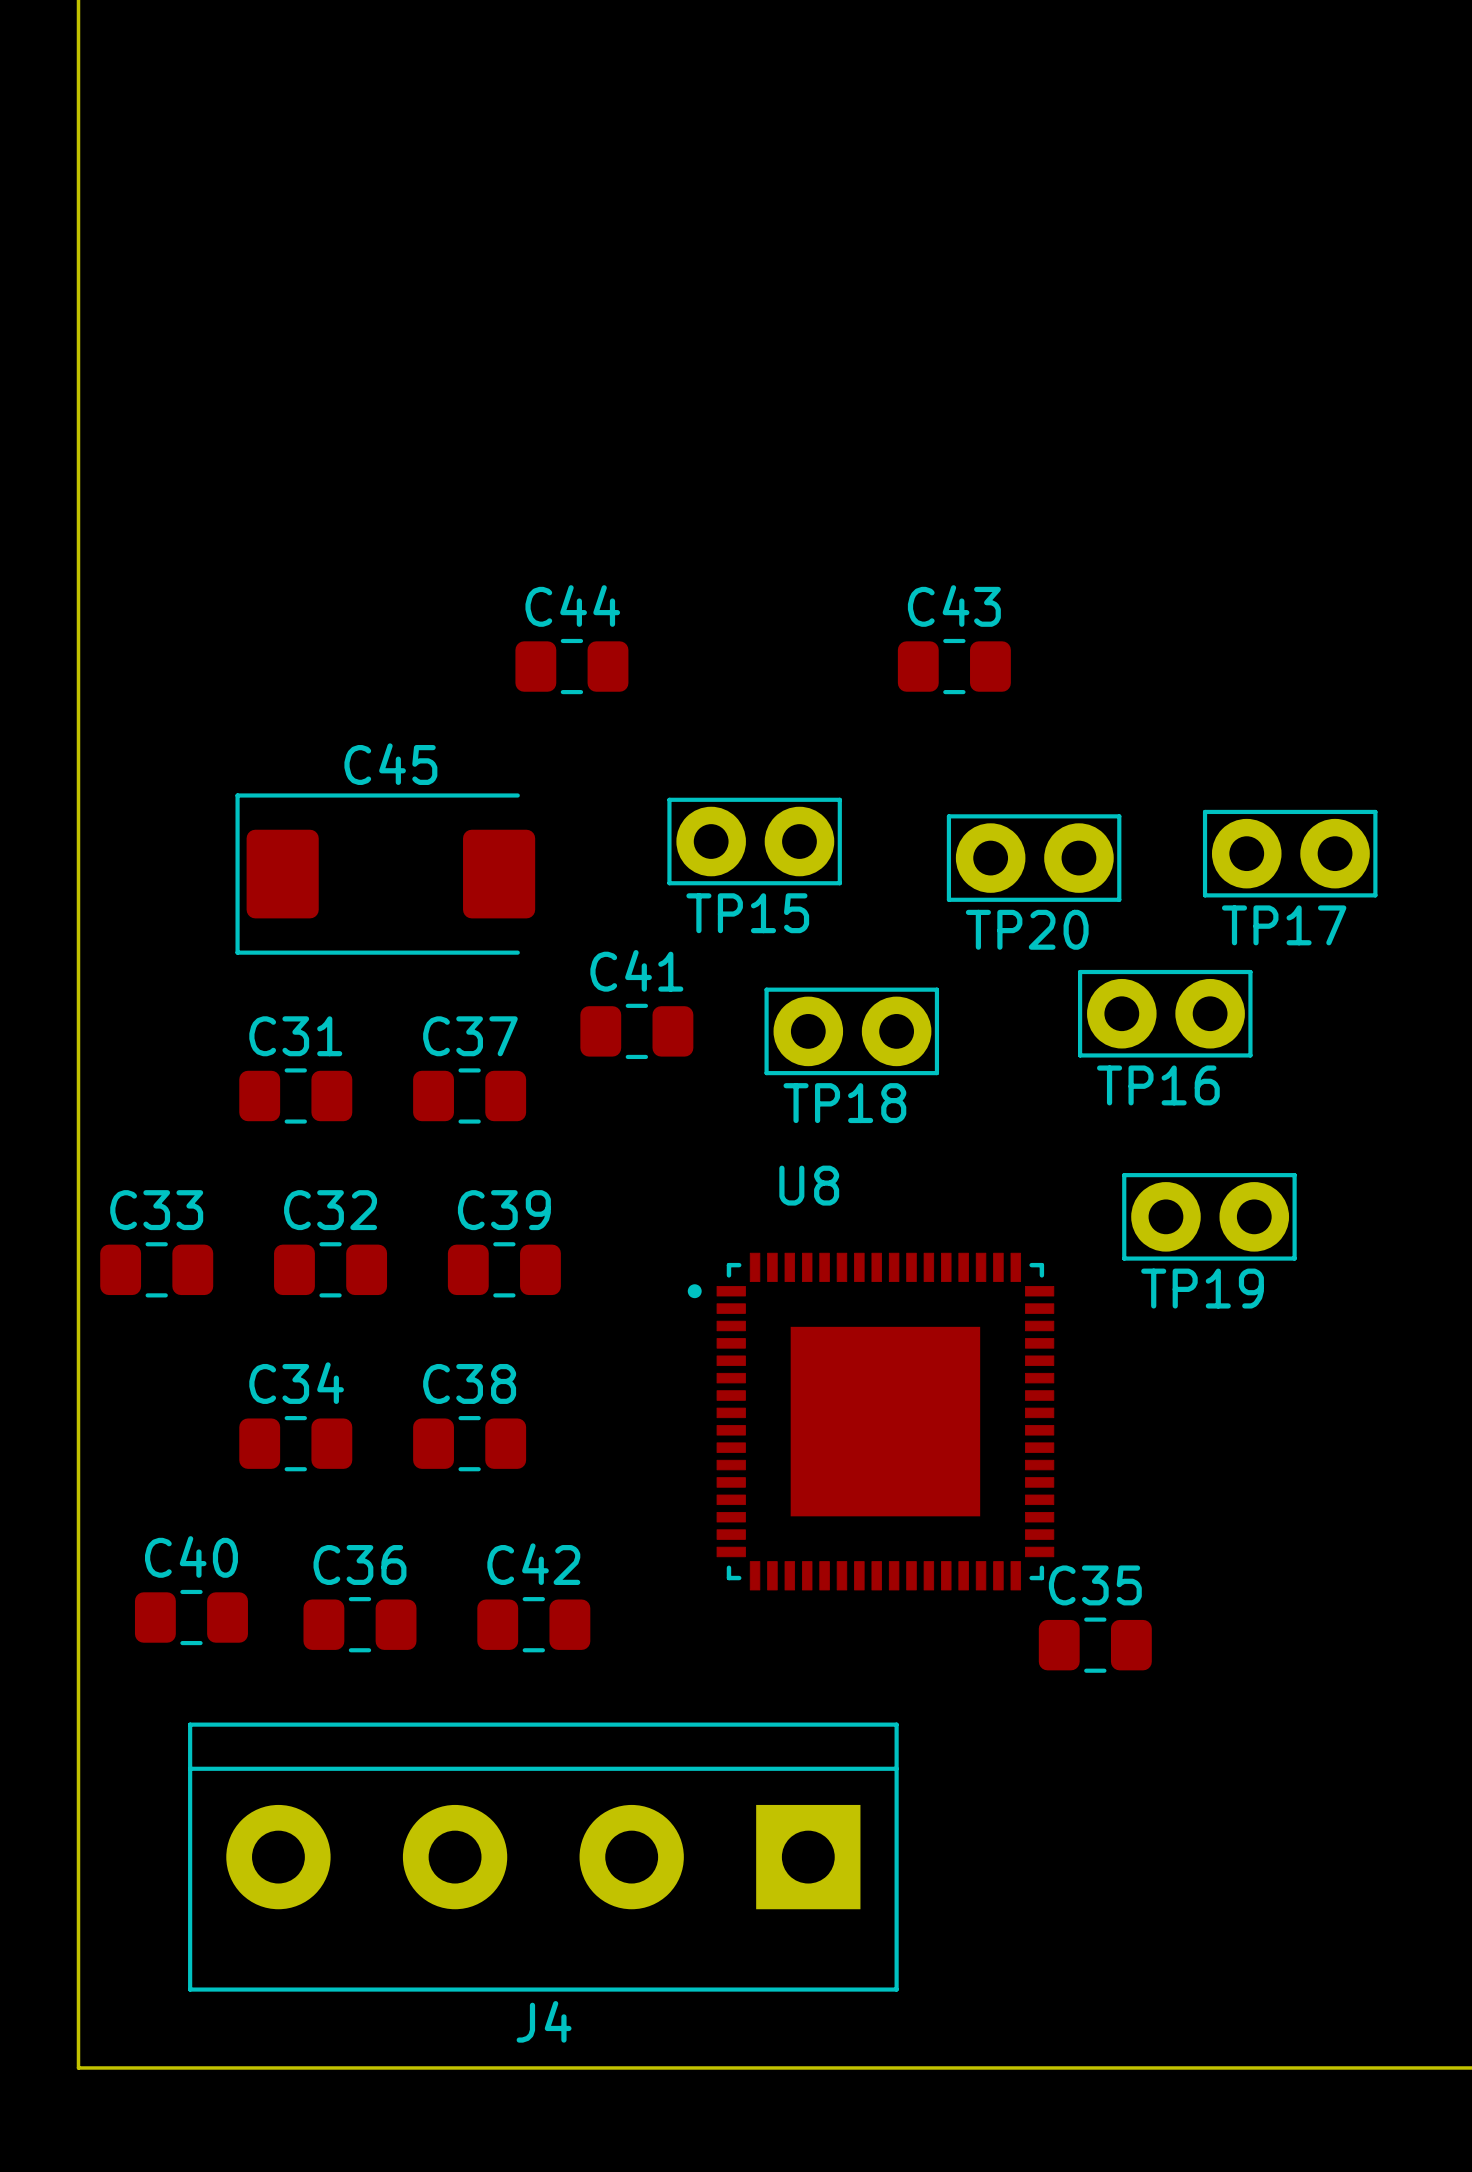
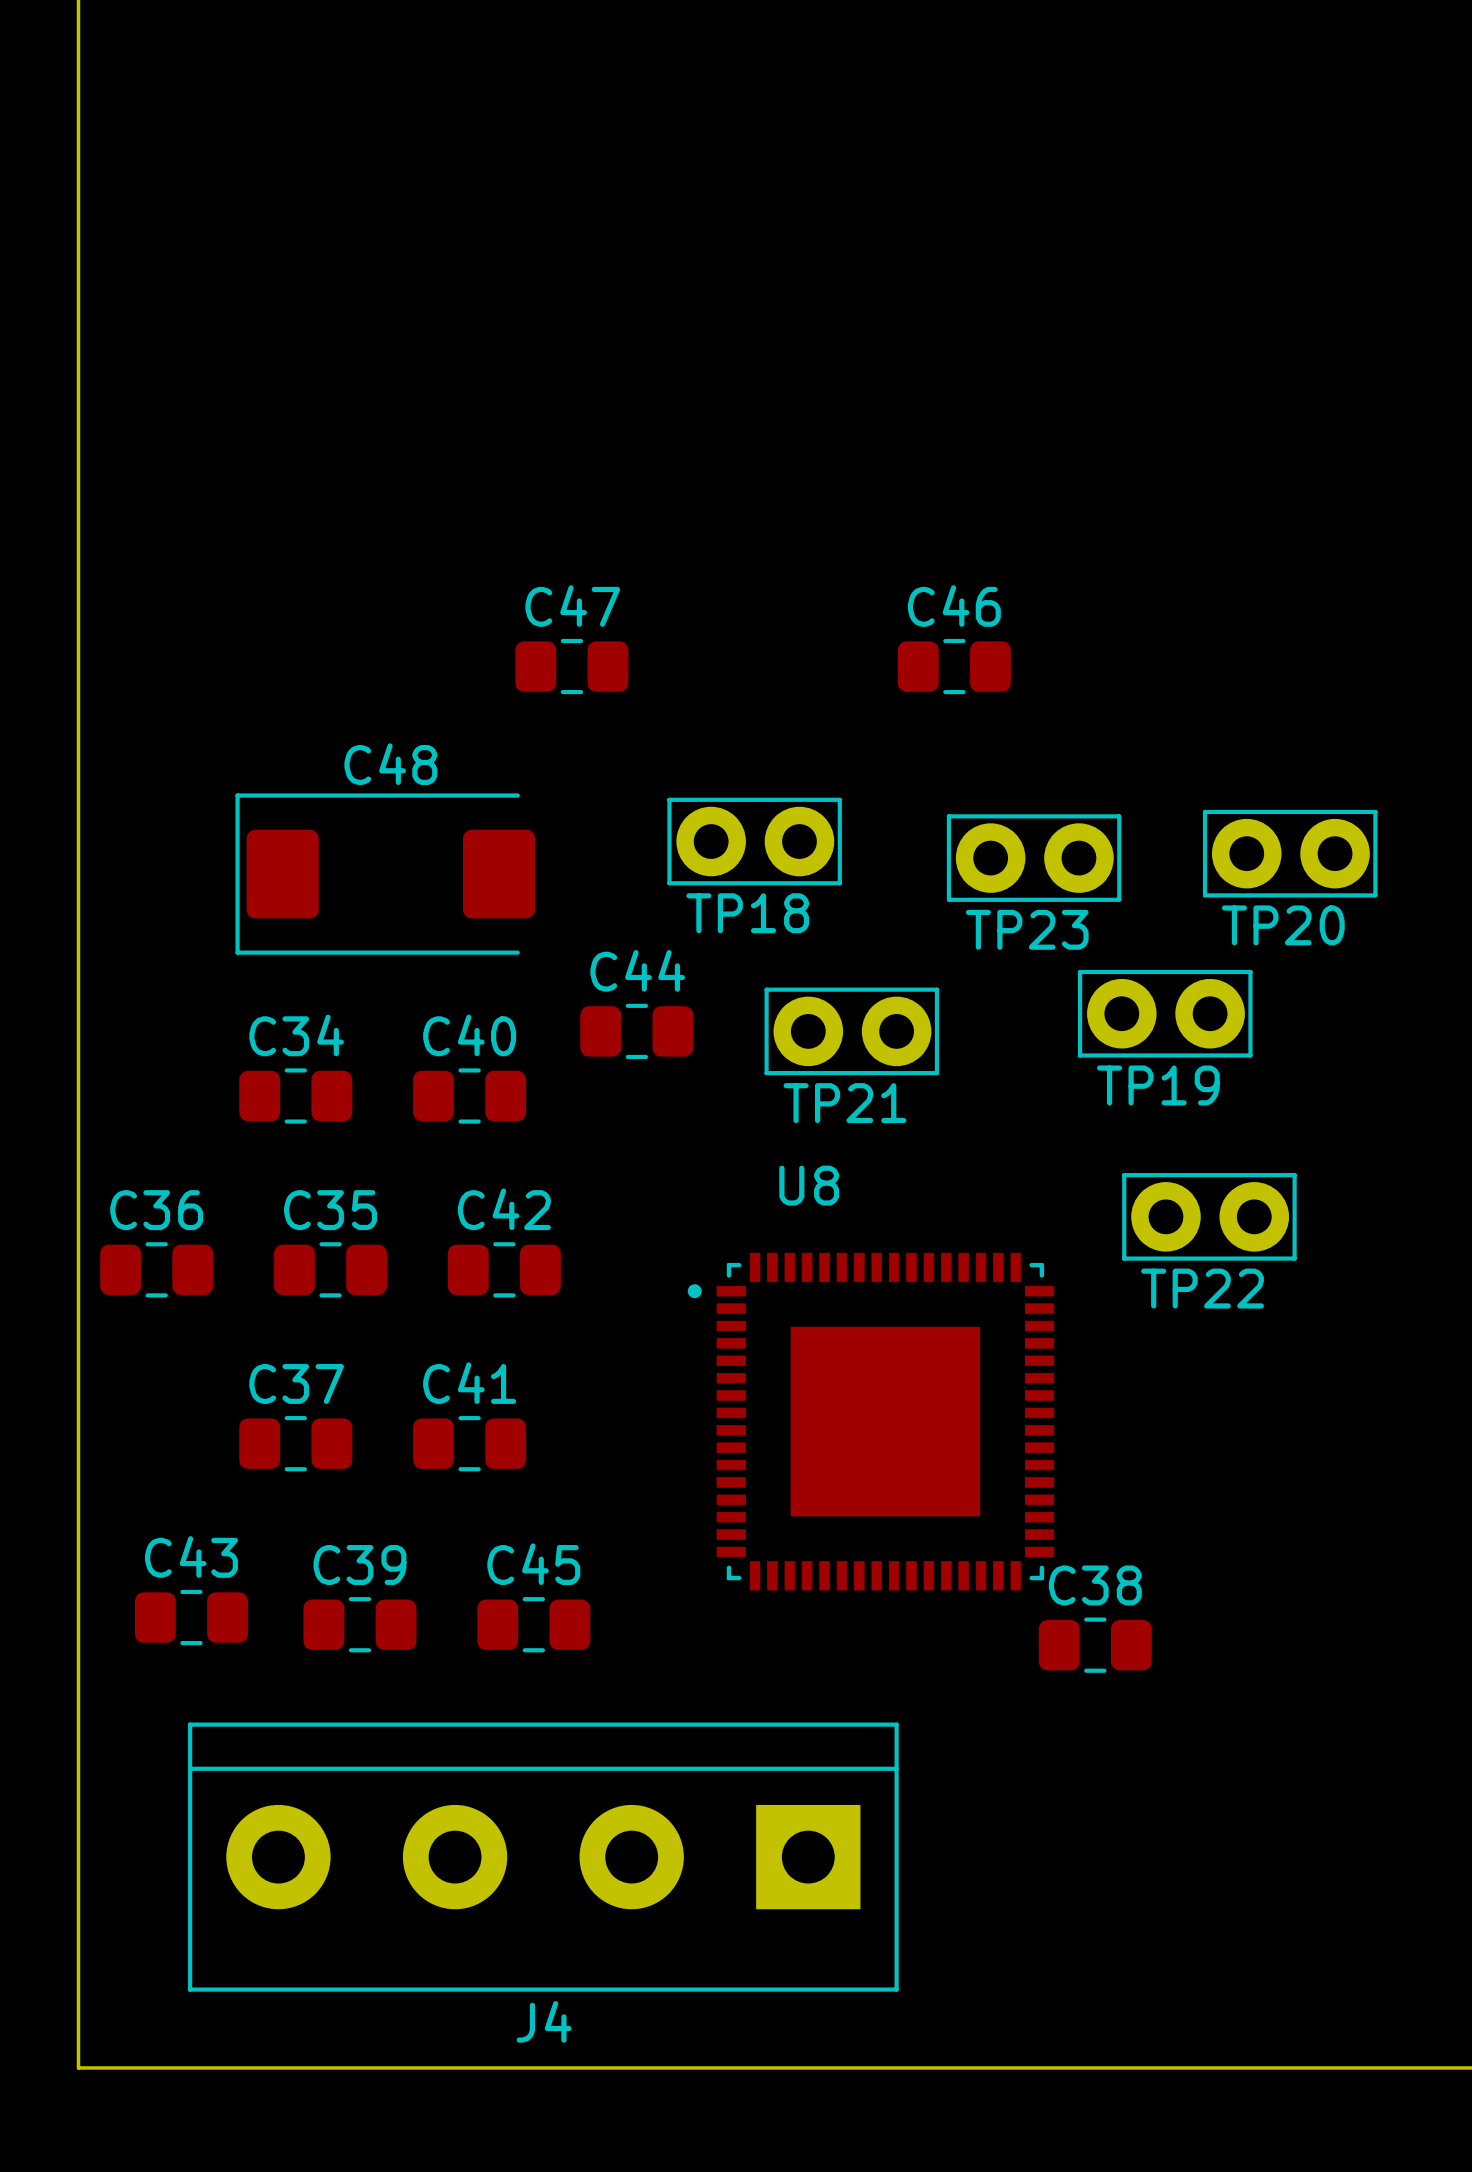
C44 name: C44 (572, 606) -> C47 (572, 606)
C43 name: C43 (954, 606) -> C46 (954, 606)
C45 name: C45 (390, 764) -> C48 (390, 764)
TP15 name: TP15 (747, 913) -> TP18 (747, 913)
TP17 name: TP17 (1284, 925) -> TP20 (1283, 925)
TP20 name: TP20 (1027, 929) -> TP23 (1027, 929)
C41 name: C41 (636, 970) -> C44 (637, 970)
C31 name: C31 (295, 1036) -> C34 (296, 1035)
C37 name: C37 (470, 1036) -> C40 (469, 1035)
TP16 name: TP16 (1158, 1085) -> TP19 (1158, 1085)
TP18 name: TP18 (844, 1103) -> TP21 (844, 1103)
C33 name: C33 (156, 1210) -> C36 (156, 1210)
C32 name: C32 (330, 1210) -> C35 (330, 1210)
C39 name: C39 (504, 1210) -> C42 (504, 1209)
TP19 name: TP19 (1202, 1288) -> TP22 (1202, 1288)
C34 name: C34 (296, 1383) -> C37 (296, 1383)
C38 name: C38 (469, 1383) -> C41 (469, 1383)
C40 name: C40 (191, 1556) -> C43 (191, 1556)
C36 name: C36 (359, 1564) -> C39 (359, 1564)
C42 name: C42 (533, 1564) -> C45 (533, 1564)
C35 name: C35 (1095, 1585) -> C38 (1095, 1585)

